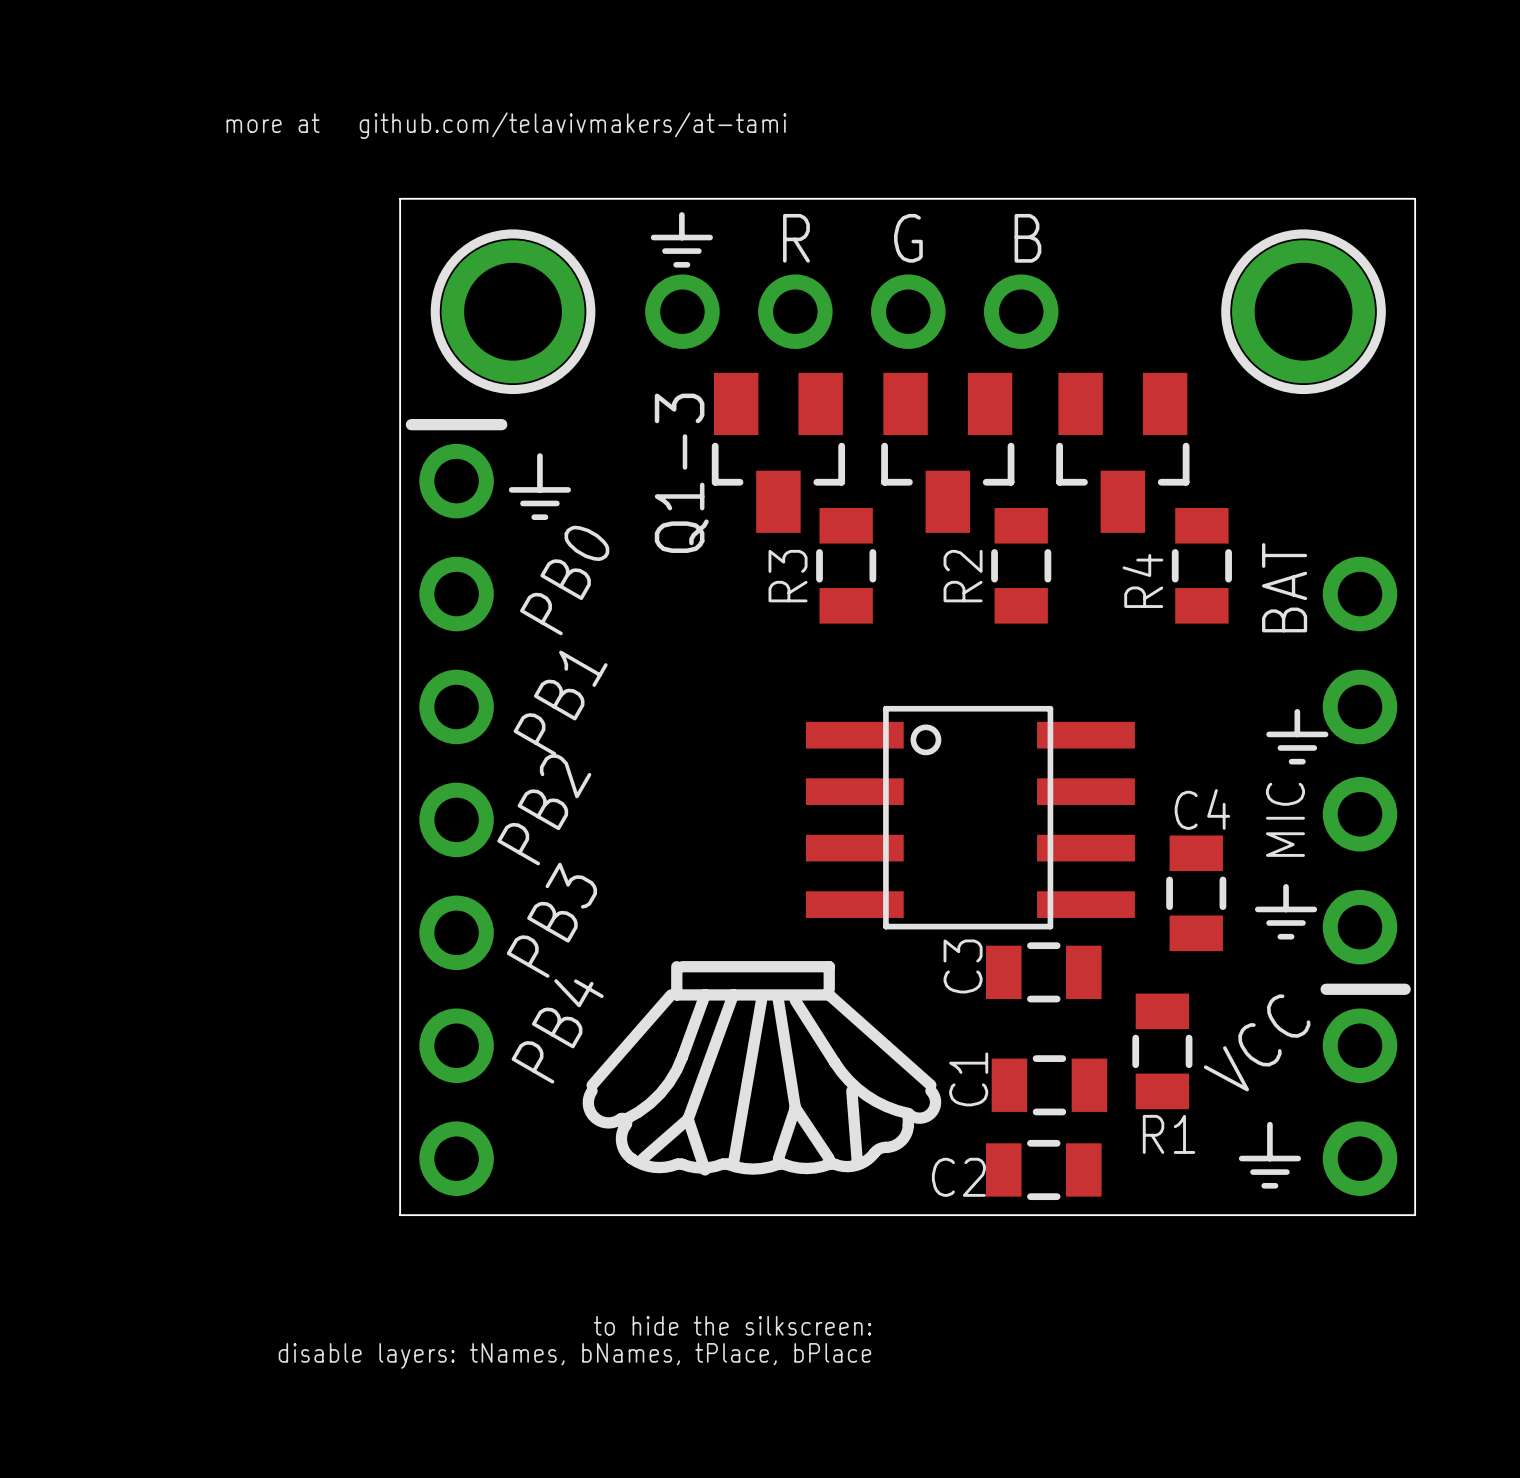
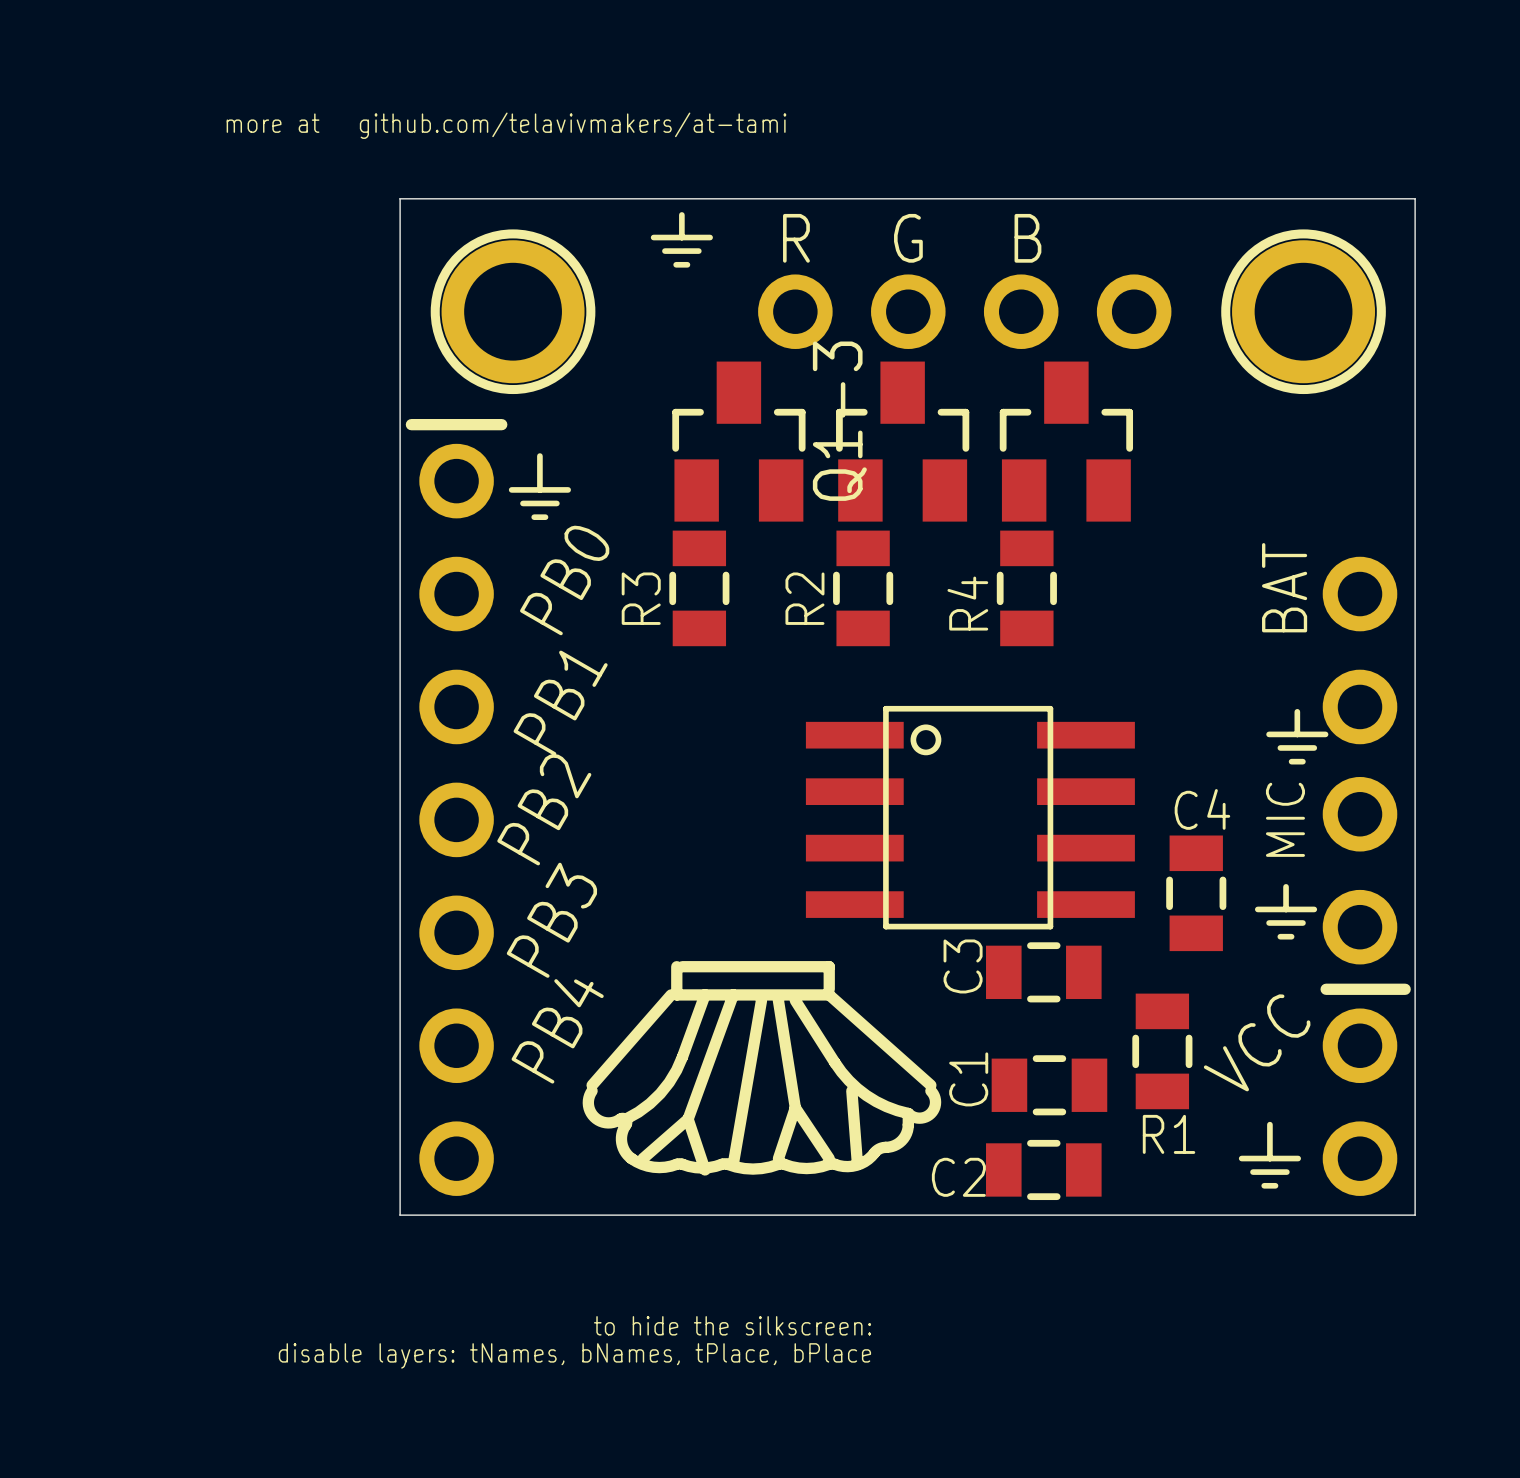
part position: (851, 311) -> (964, 311)
Q1-3 rotation: 0° (778, 452) -> 180° (738, 441)
part rotation: 0° (947, 452) -> 180° (902, 441)
part rotation: 0° (1122, 452) -> 180° (1066, 441)
R3 position: (846, 565) -> (699, 588)
R2 position: (1021, 565) -> (863, 588)
R4 position: (1201, 565) -> (1026, 588)

